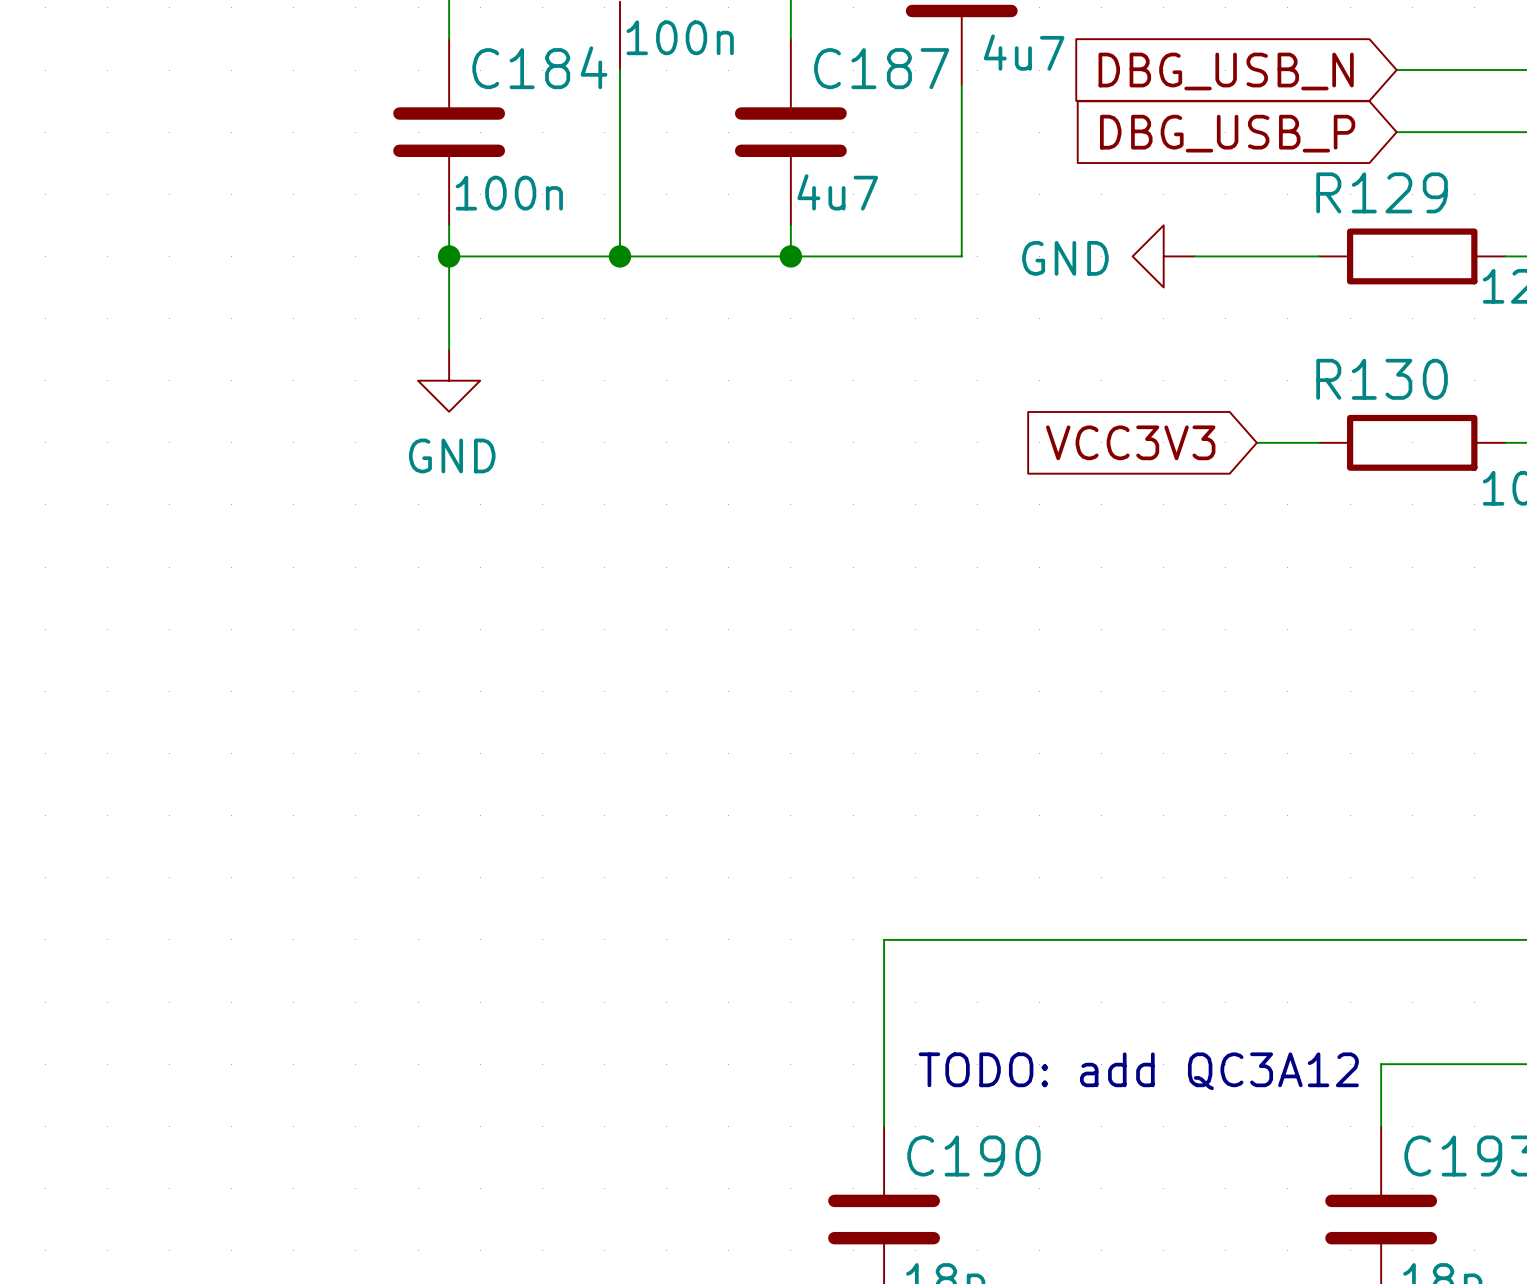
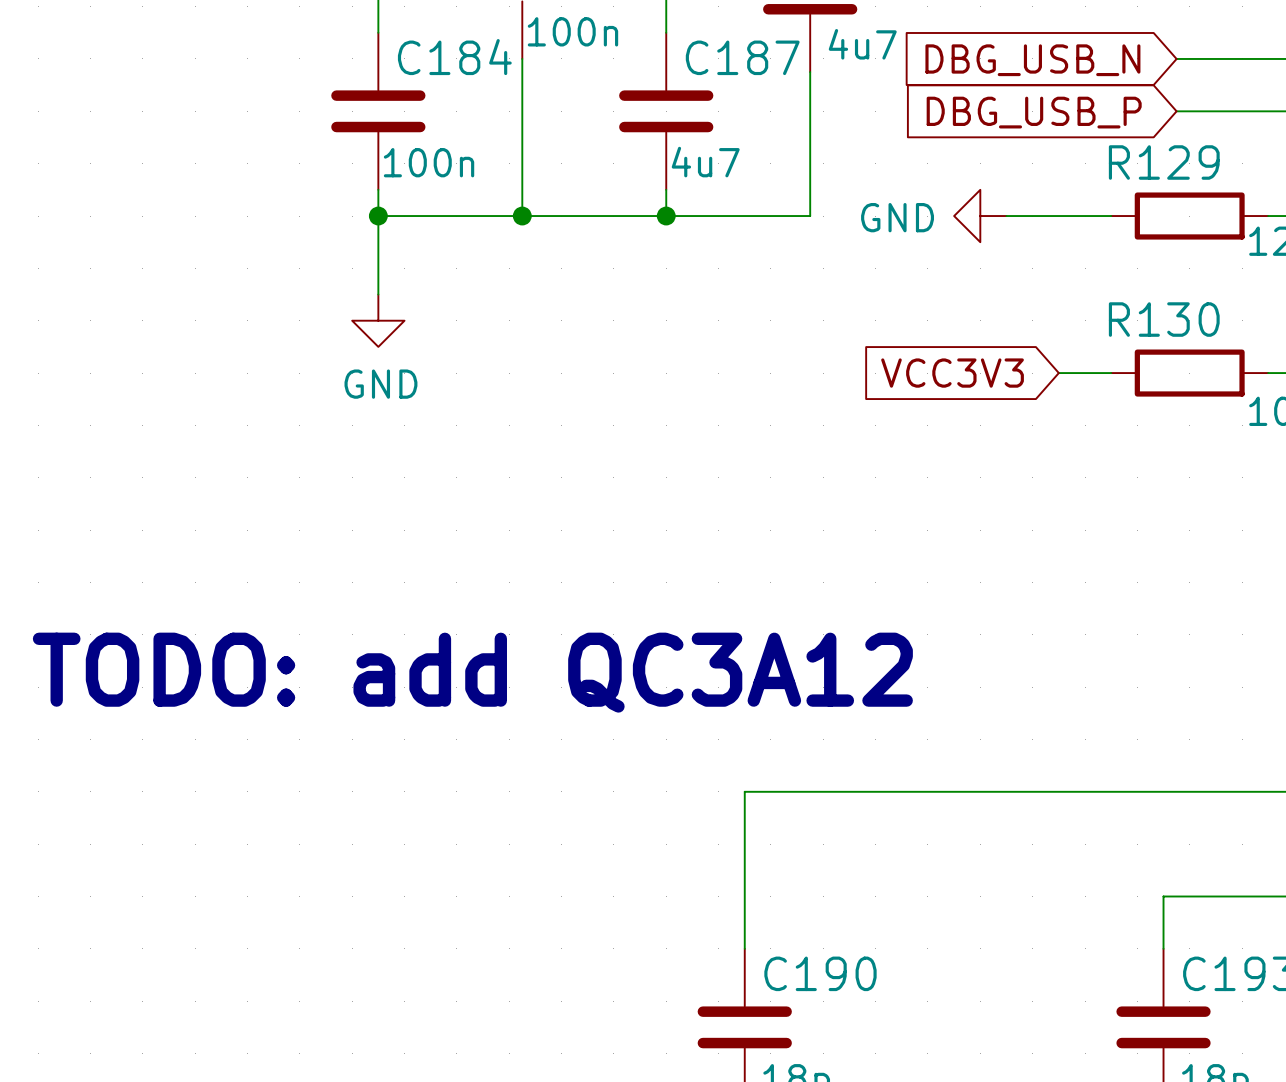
text: none -> TODO: add QC3A12 (472, 672)
text: TODO: add QC3A12 (1138, 1071) -> none

